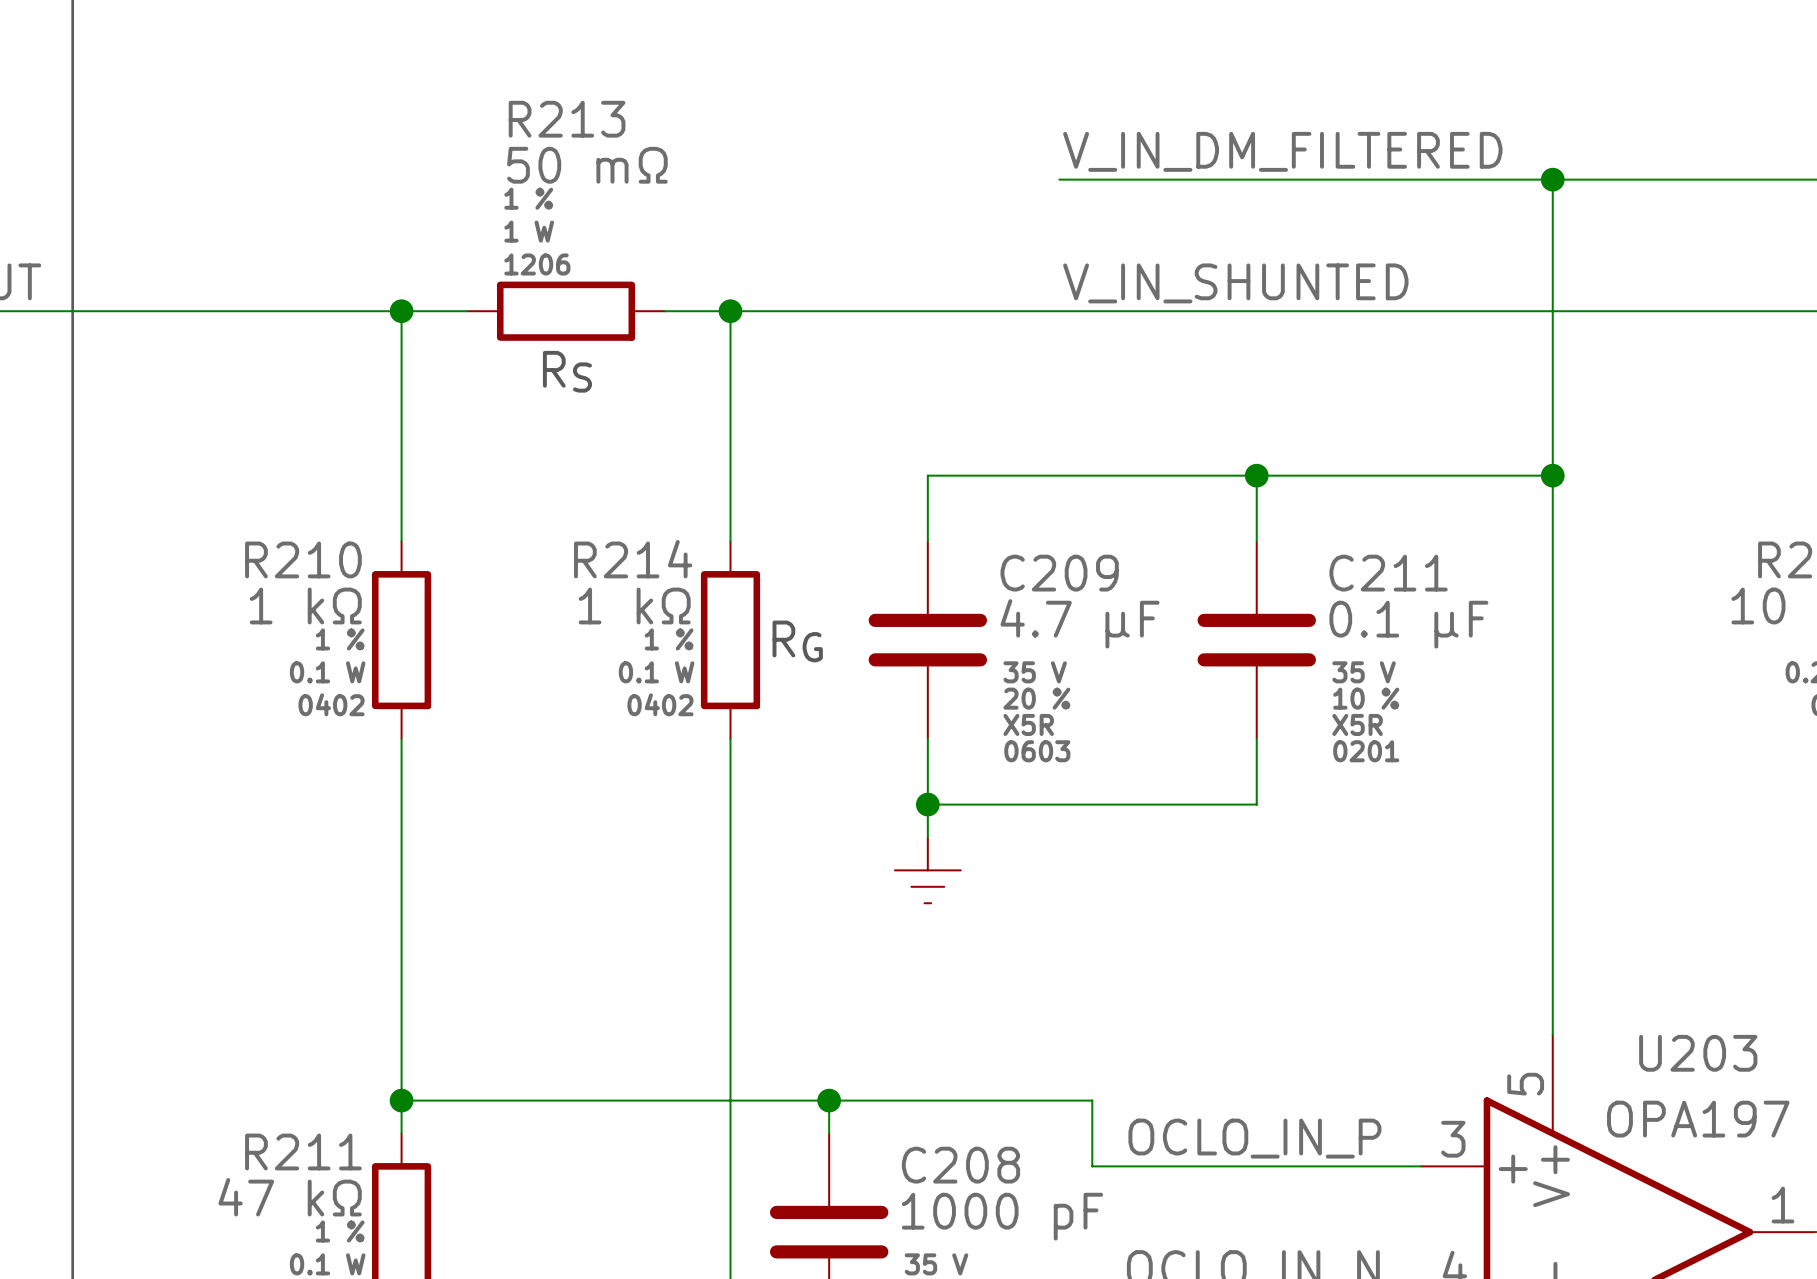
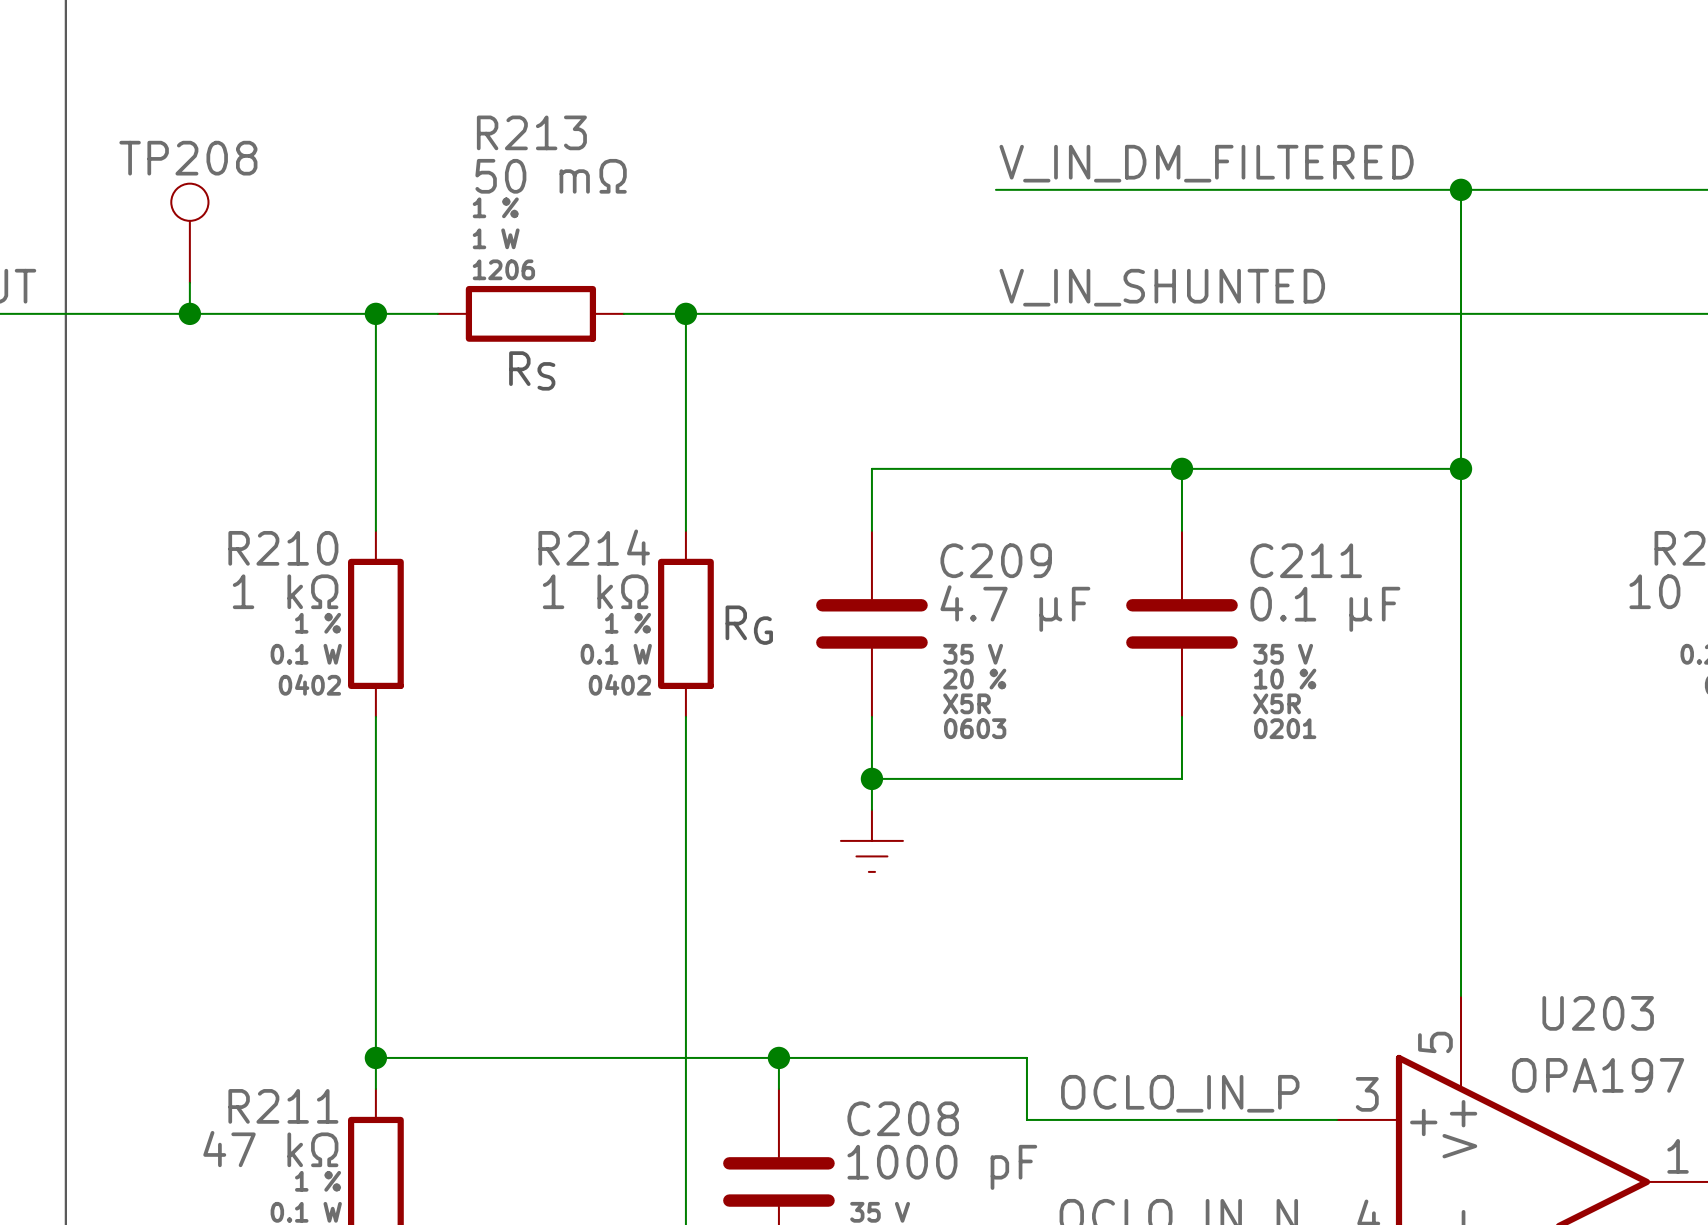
TP208: none -> (189, 233)
wire: none -> (189, 282) (189, 313)
junction: none -> (189, 313)

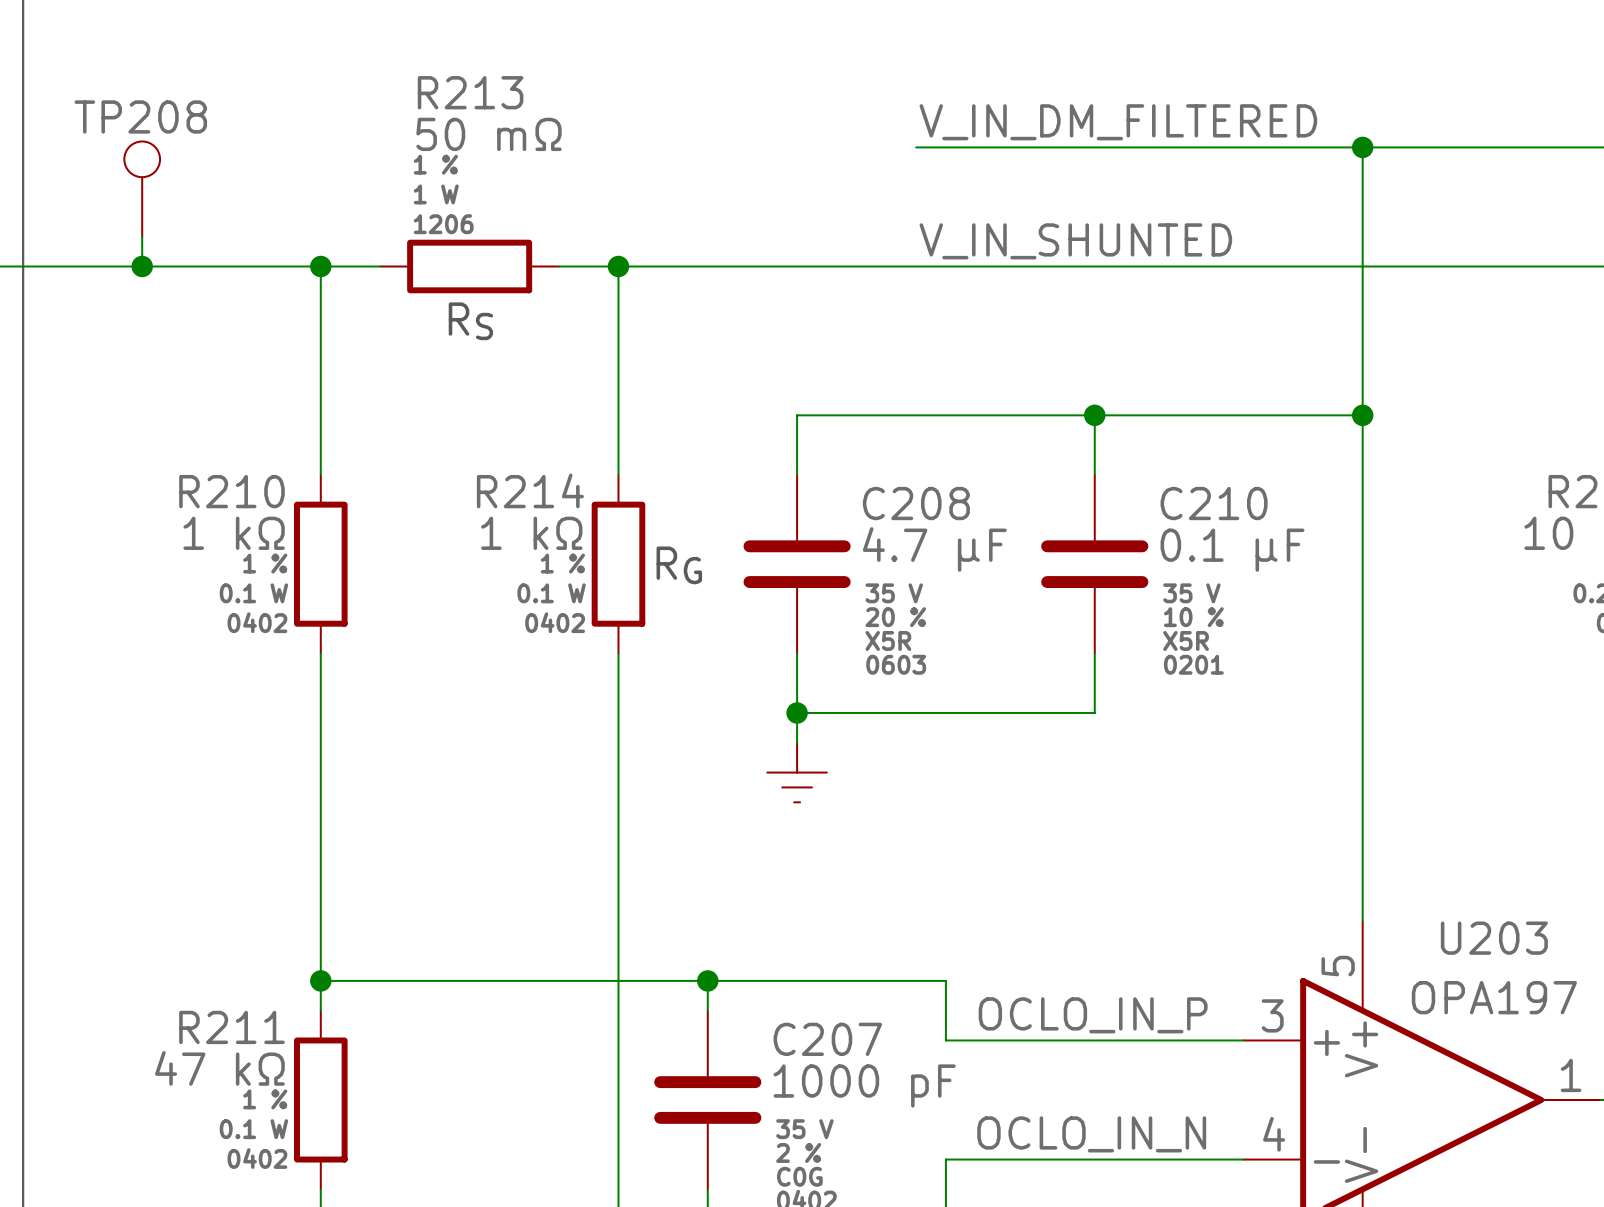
C209 name: C209 (996, 560) -> C208 (916, 503)
C211 name: C211 (1306, 560) -> C210 (1214, 503)
C208 name: C208 (903, 1118) -> C207 (827, 1039)

